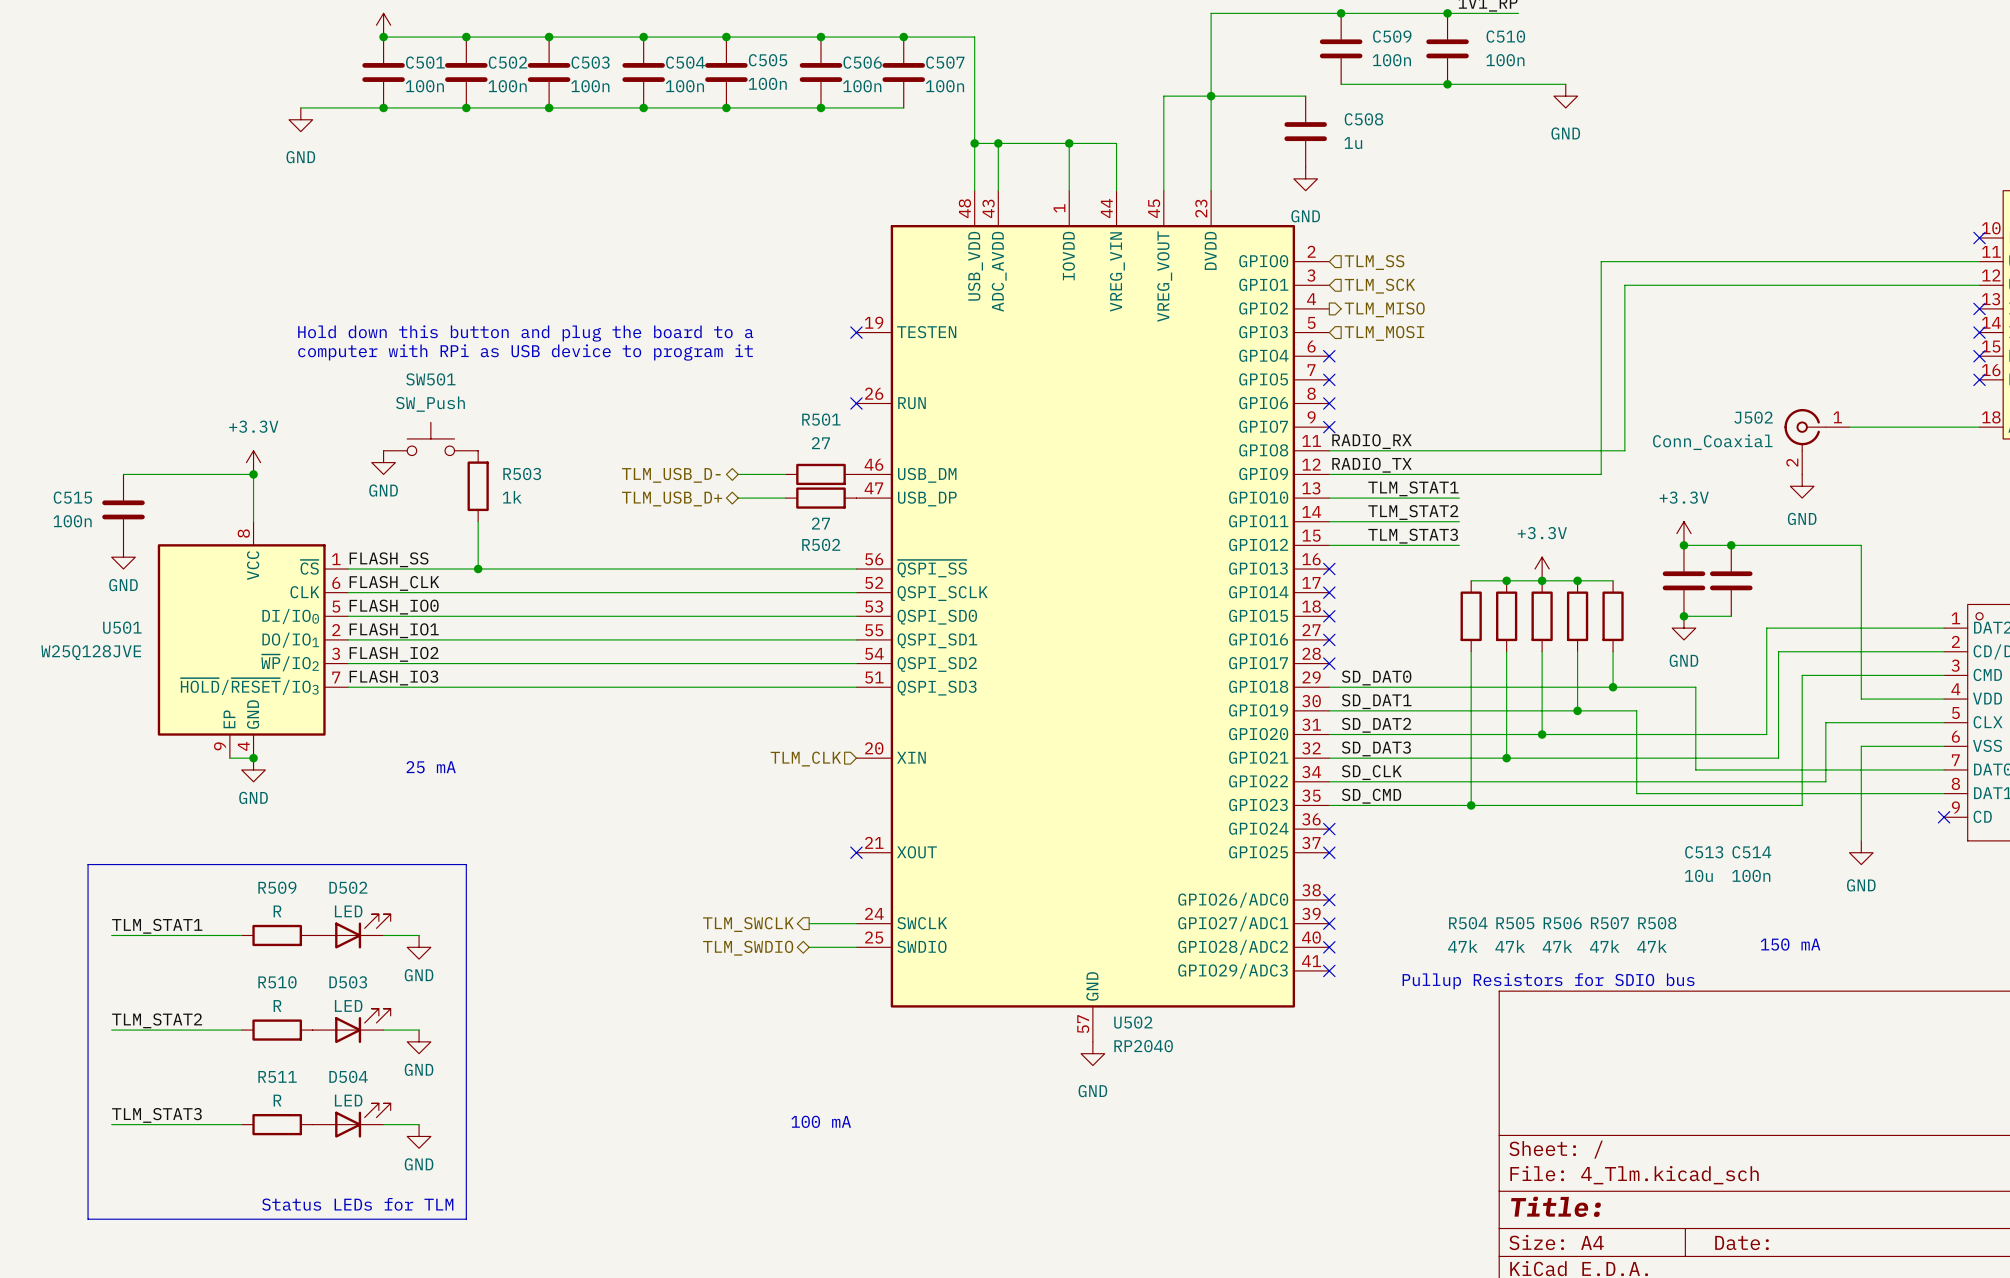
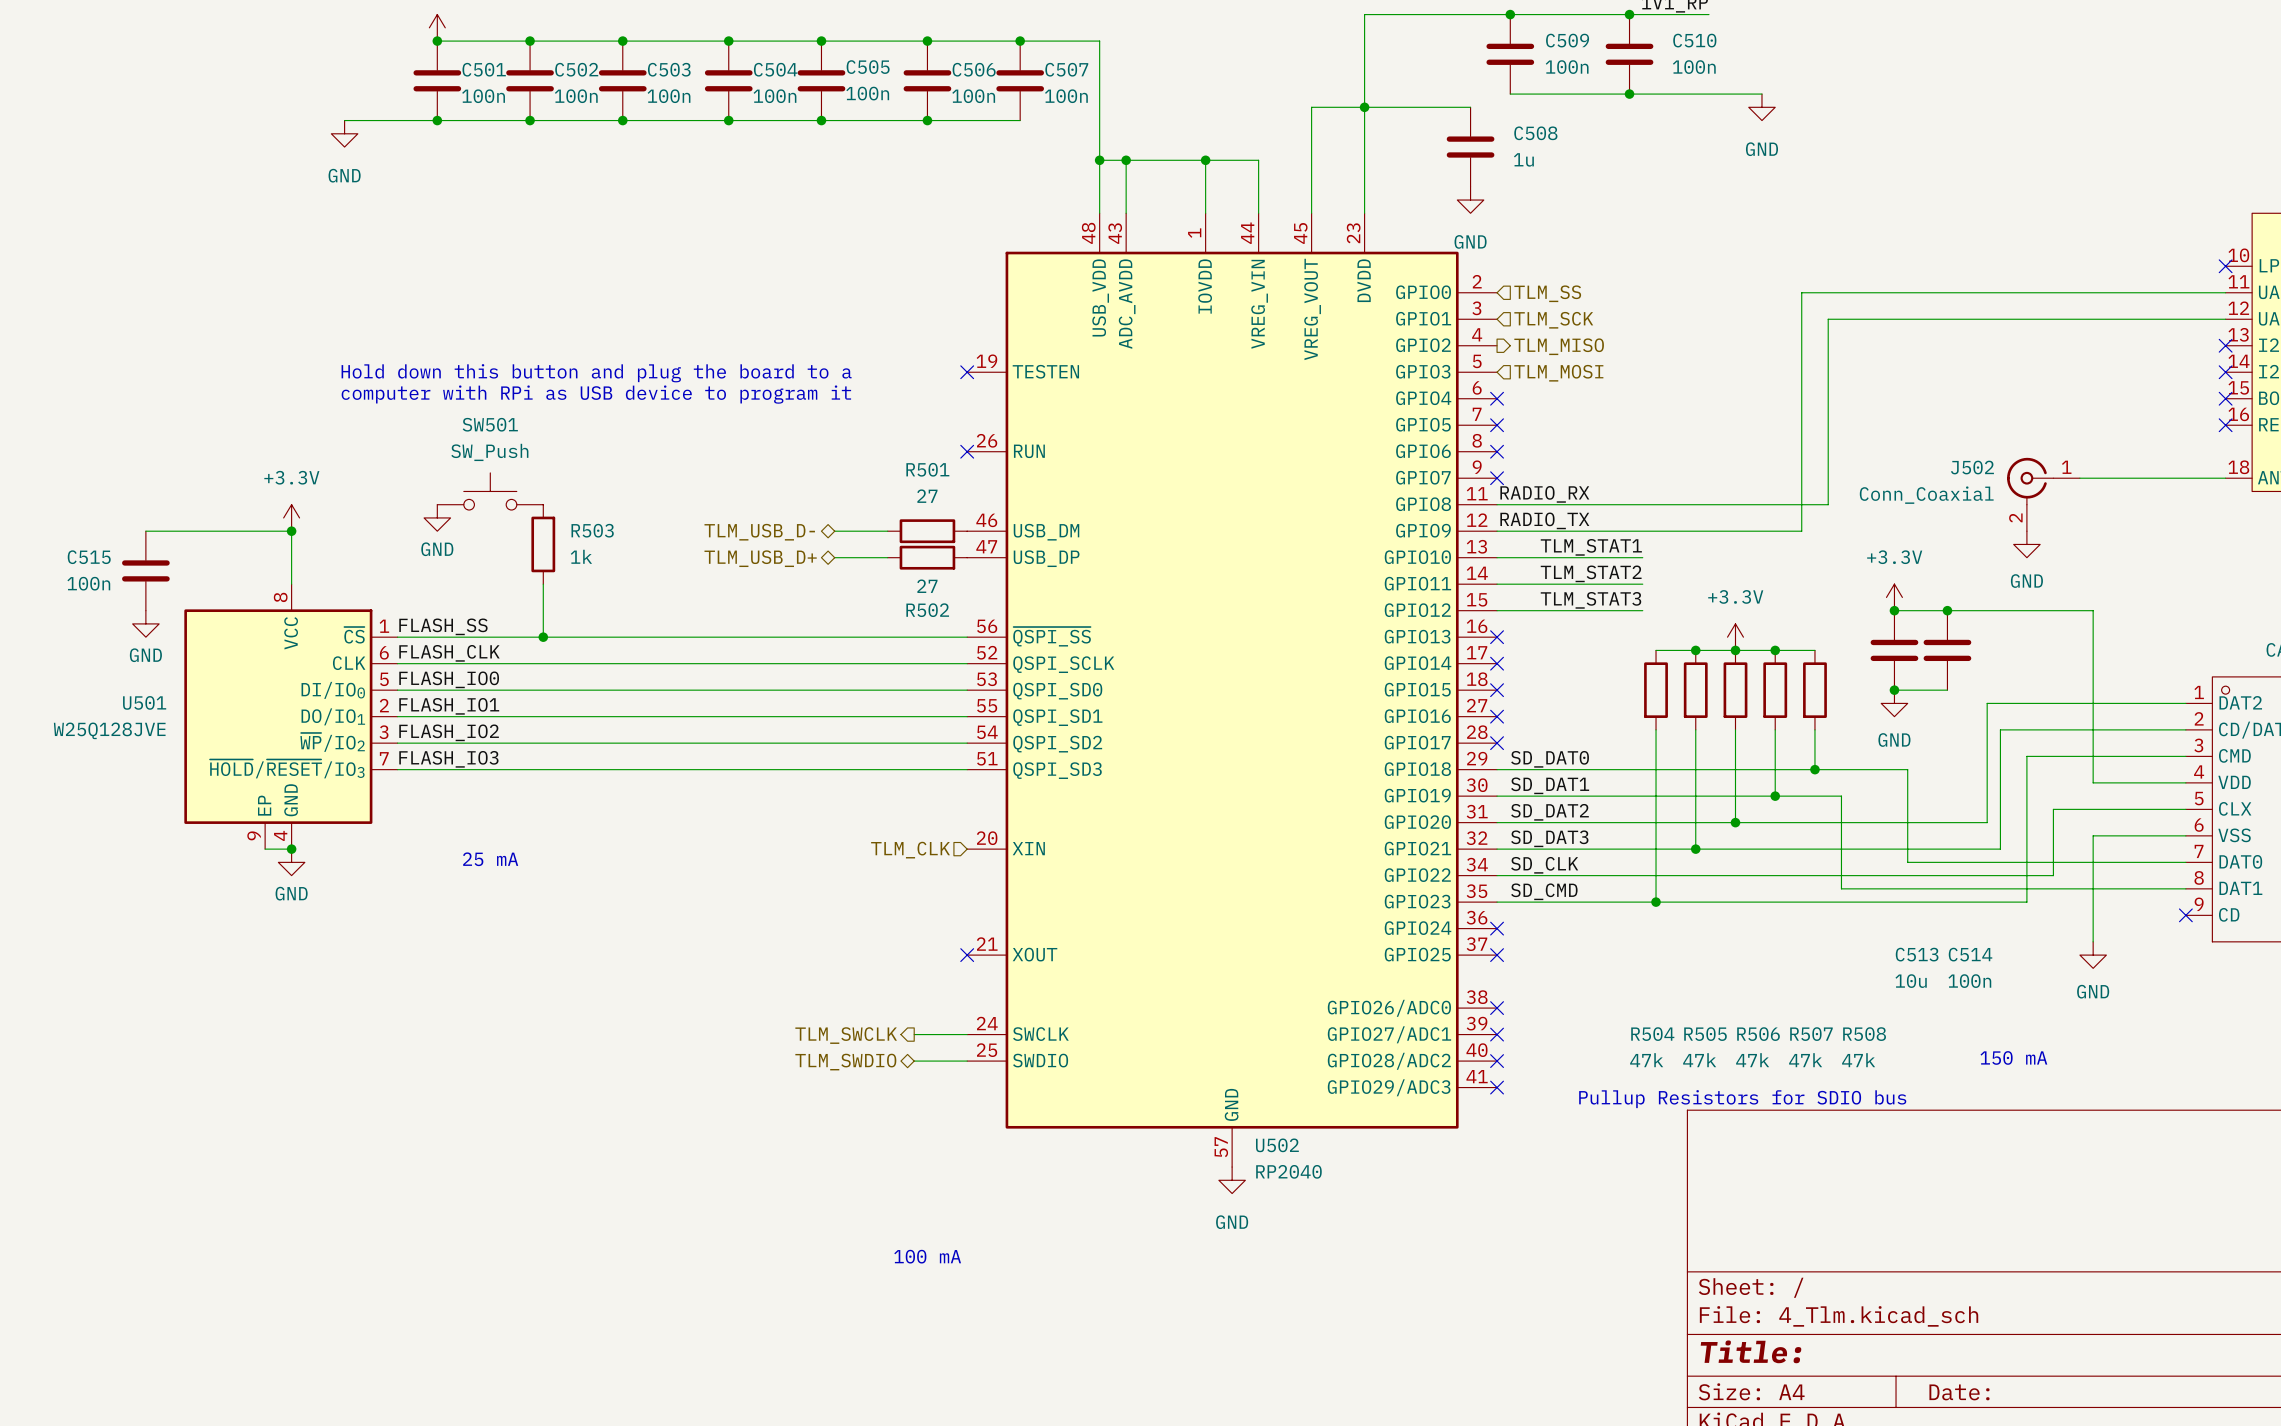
line: (88, 864) (466, 864) (466, 1219) (88, 1219) (88, 864) -> none
label: TLM_STAT1 (157, 926) -> none
D502: LED (351, 931) -> none
wire: (111, 935) (241, 935) -> none
R509: R (277, 935) -> none
wire: (383, 935) (419, 935) -> none
power symbol: GND (419, 947) -> none
label: TLM_STAT2 (157, 1020) -> none
D503: LED (351, 1025) -> none
wire: (111, 1030) (241, 1030) -> none
R510: R (277, 1030) -> none
wire: (383, 1030) (419, 1030) -> none
power symbol: GND (419, 1041) -> none
label: TLM_STAT3 (156, 1115) -> none
D504: LED (351, 1120) -> none
wire: (111, 1124) (241, 1124) -> none
R511: R (277, 1124) -> none
wire: (383, 1124) (419, 1124) -> none
power symbol: GND (419, 1136) -> none
text: Status LEDs for TLM (357, 1204) -> none

